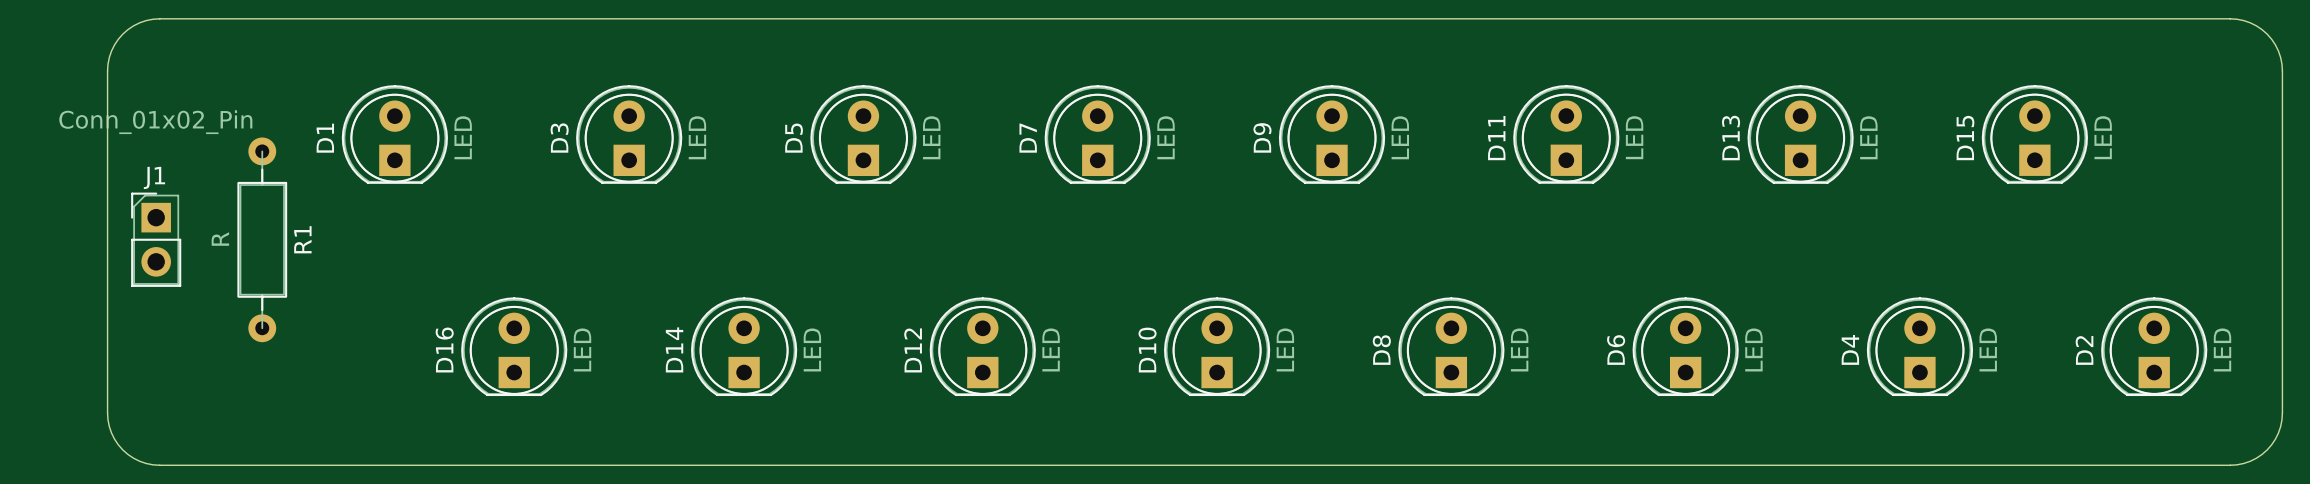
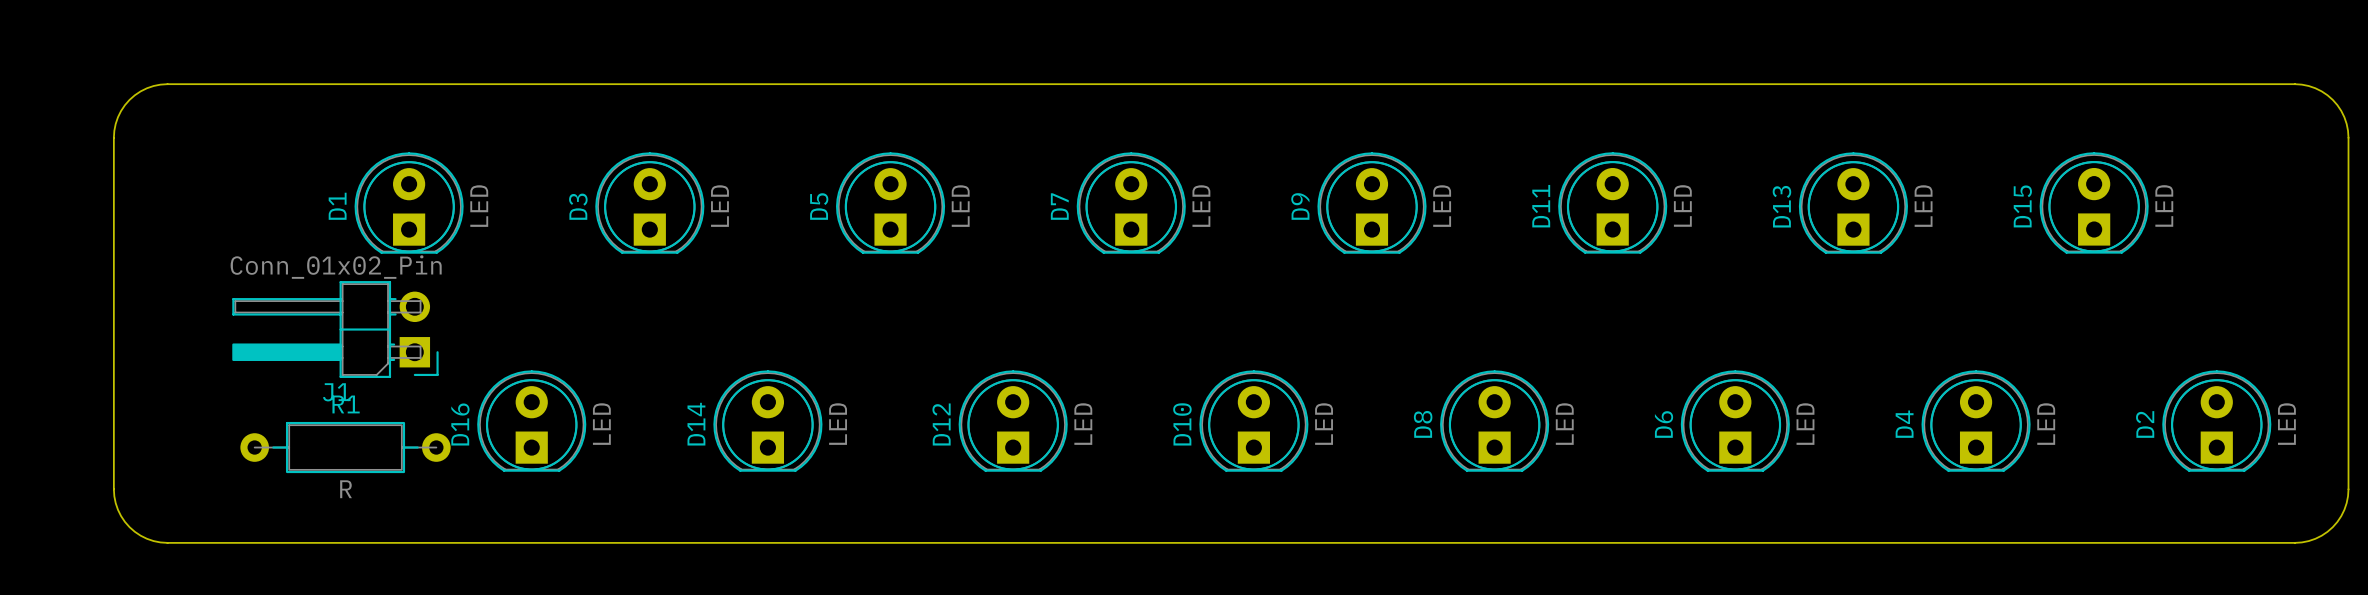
J1 value position: Conn_01x02_Pin (155, 122) -> Conn_01x02_Pin (336, 267)
J1 name position: J1 (154, 177) -> J1 (336, 392)
J1 footprint: [131, 192, 182, 287] -> [232, 281, 439, 378]
R1 value position: R (220, 239) -> R (346, 489)
R1 rotation: 0° (262, 239) -> 90° clockwise (345, 447)
R1 position: (262, 239) -> (345, 447)
R1 name position: R1 (302, 239) -> R1 (346, 404)

